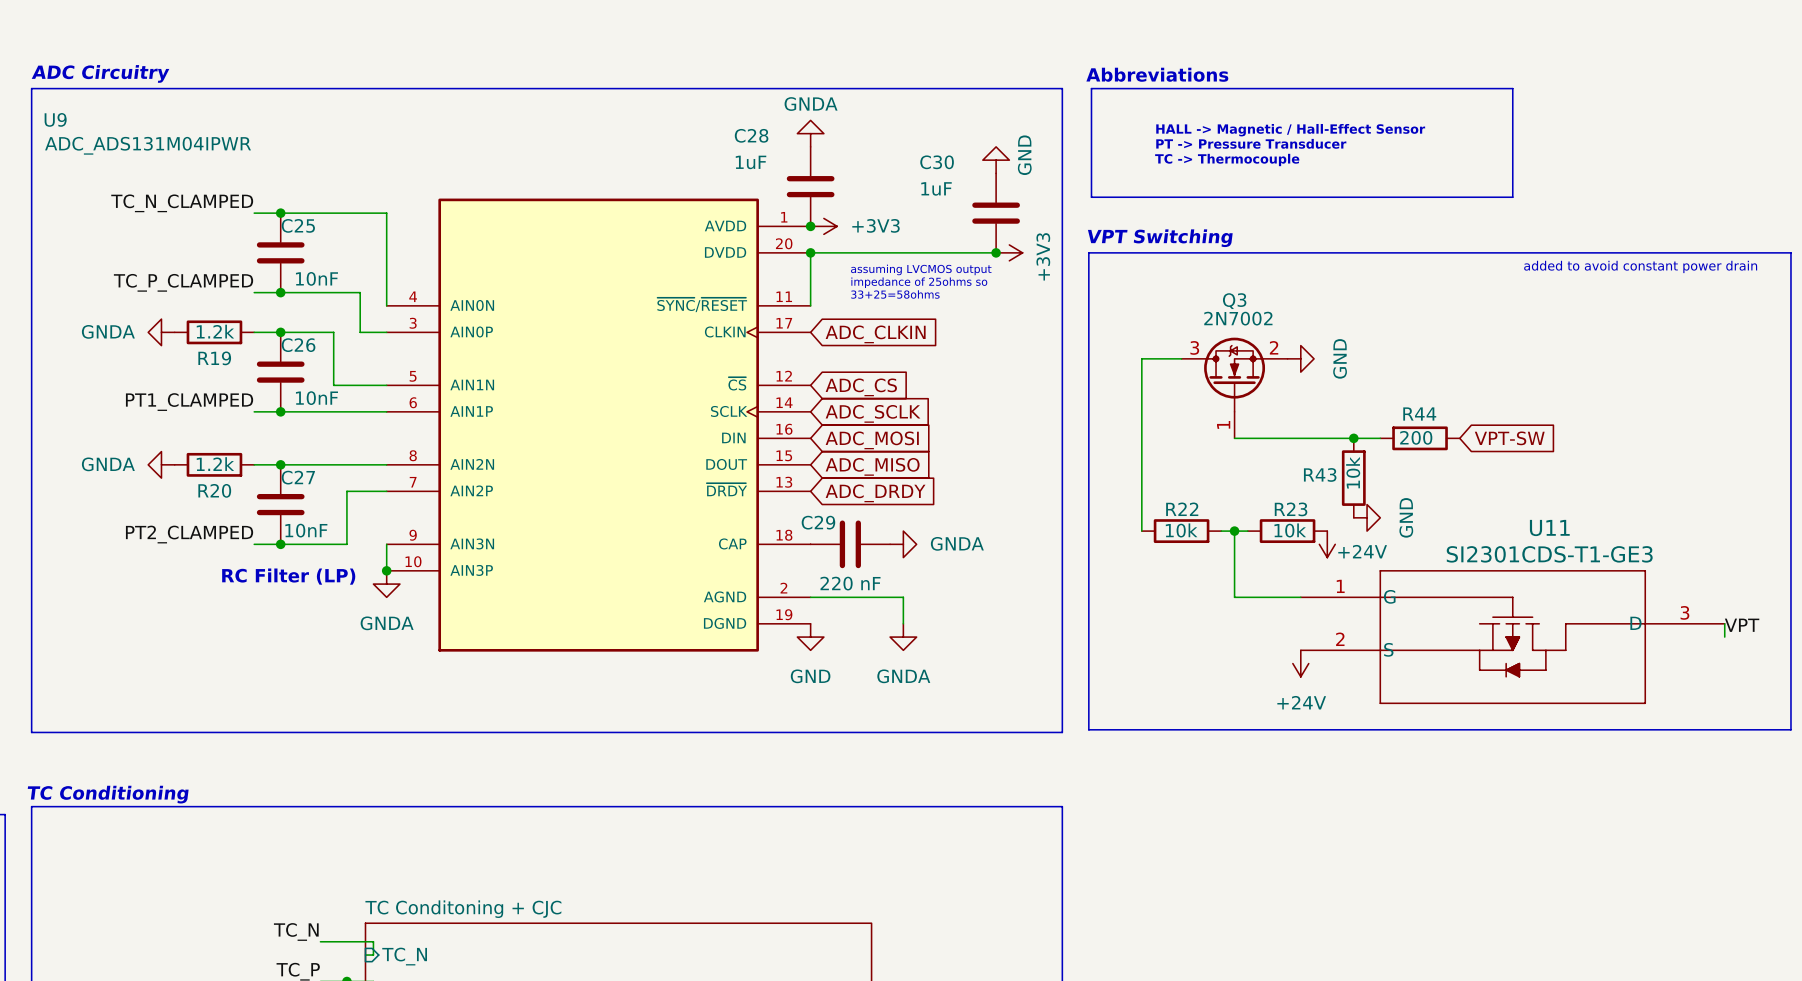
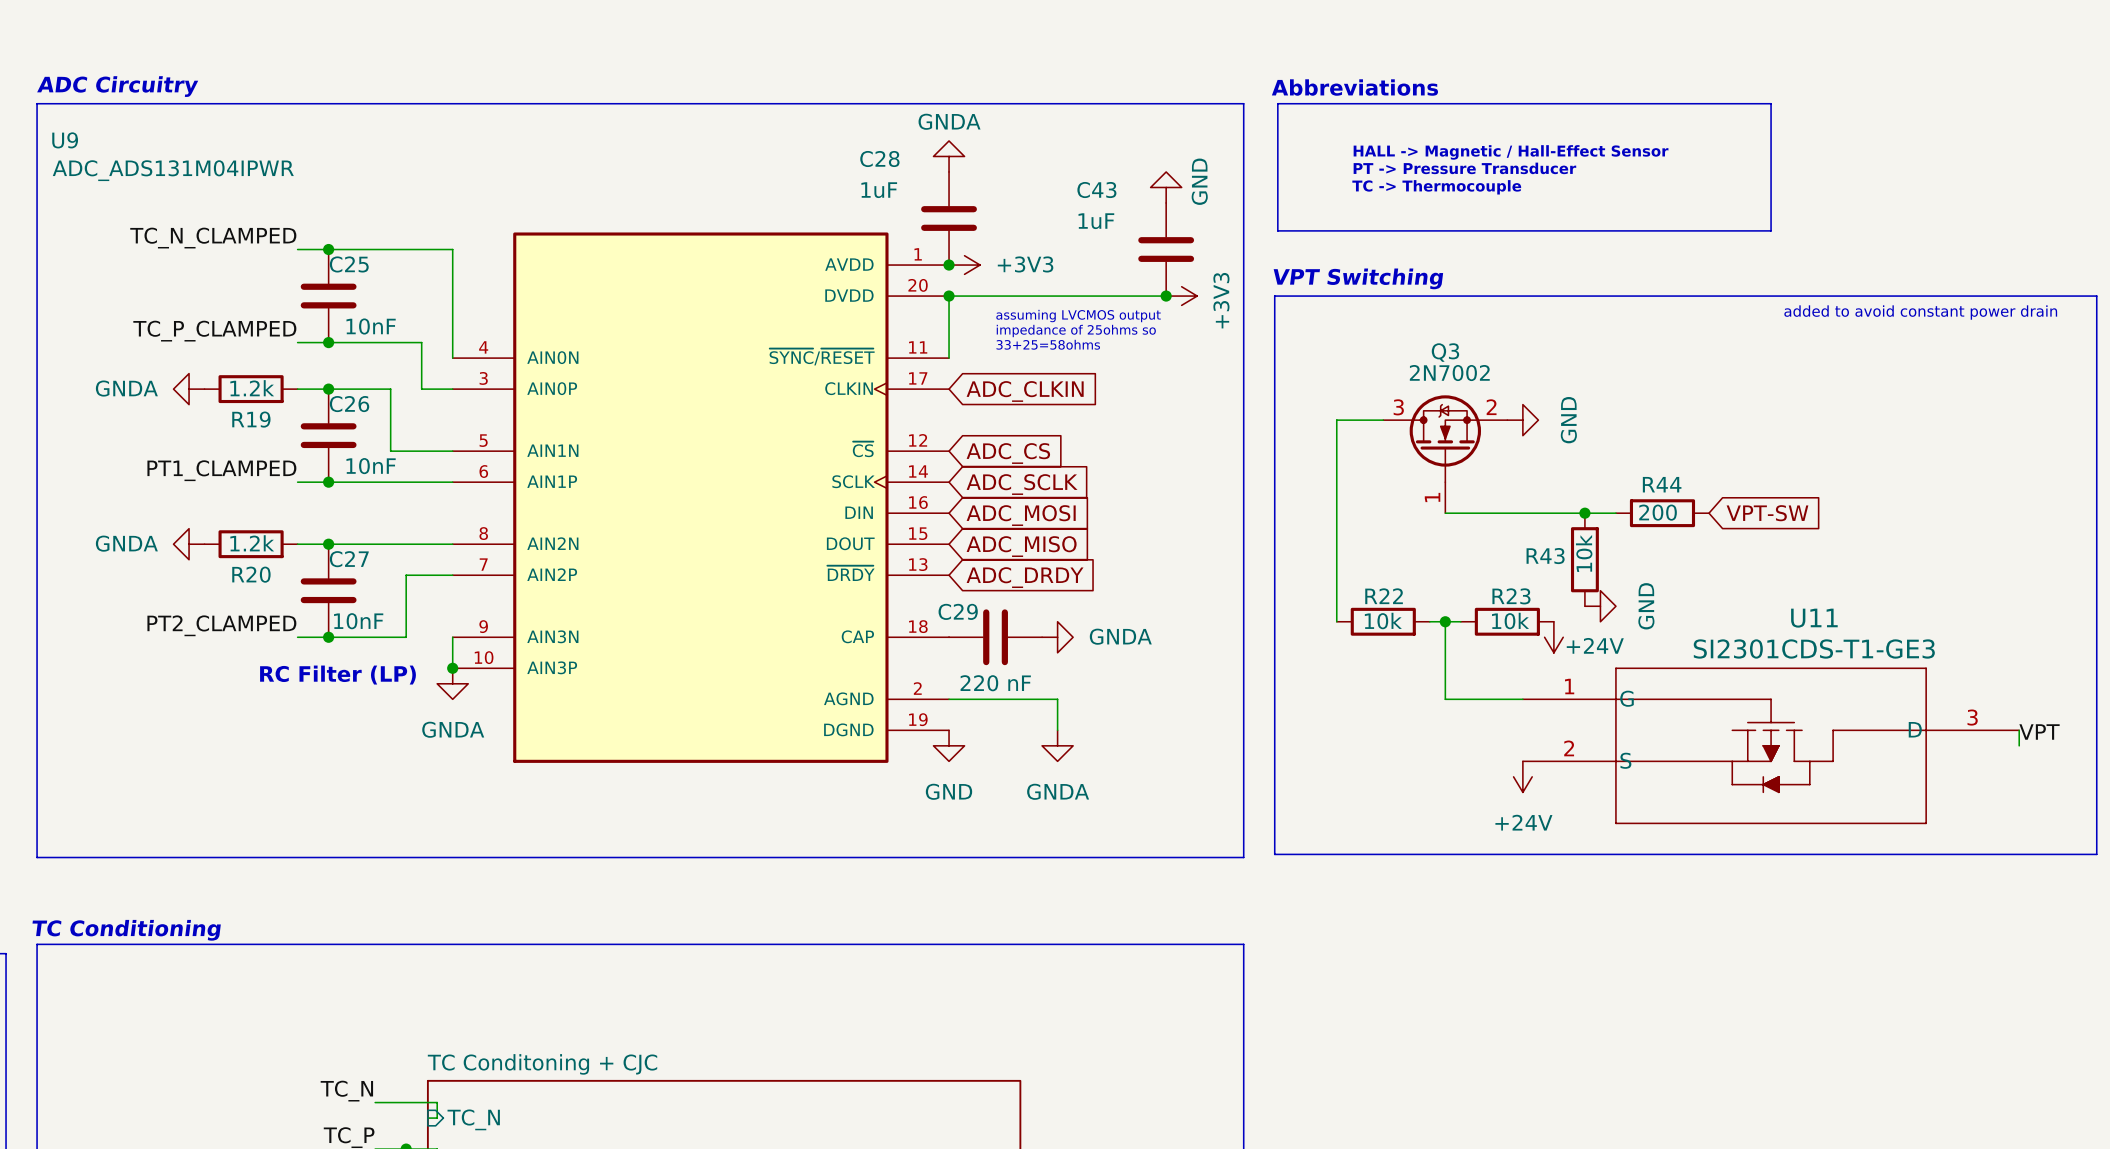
C30 name: C30 (937, 162) -> C43 (1096, 190)

